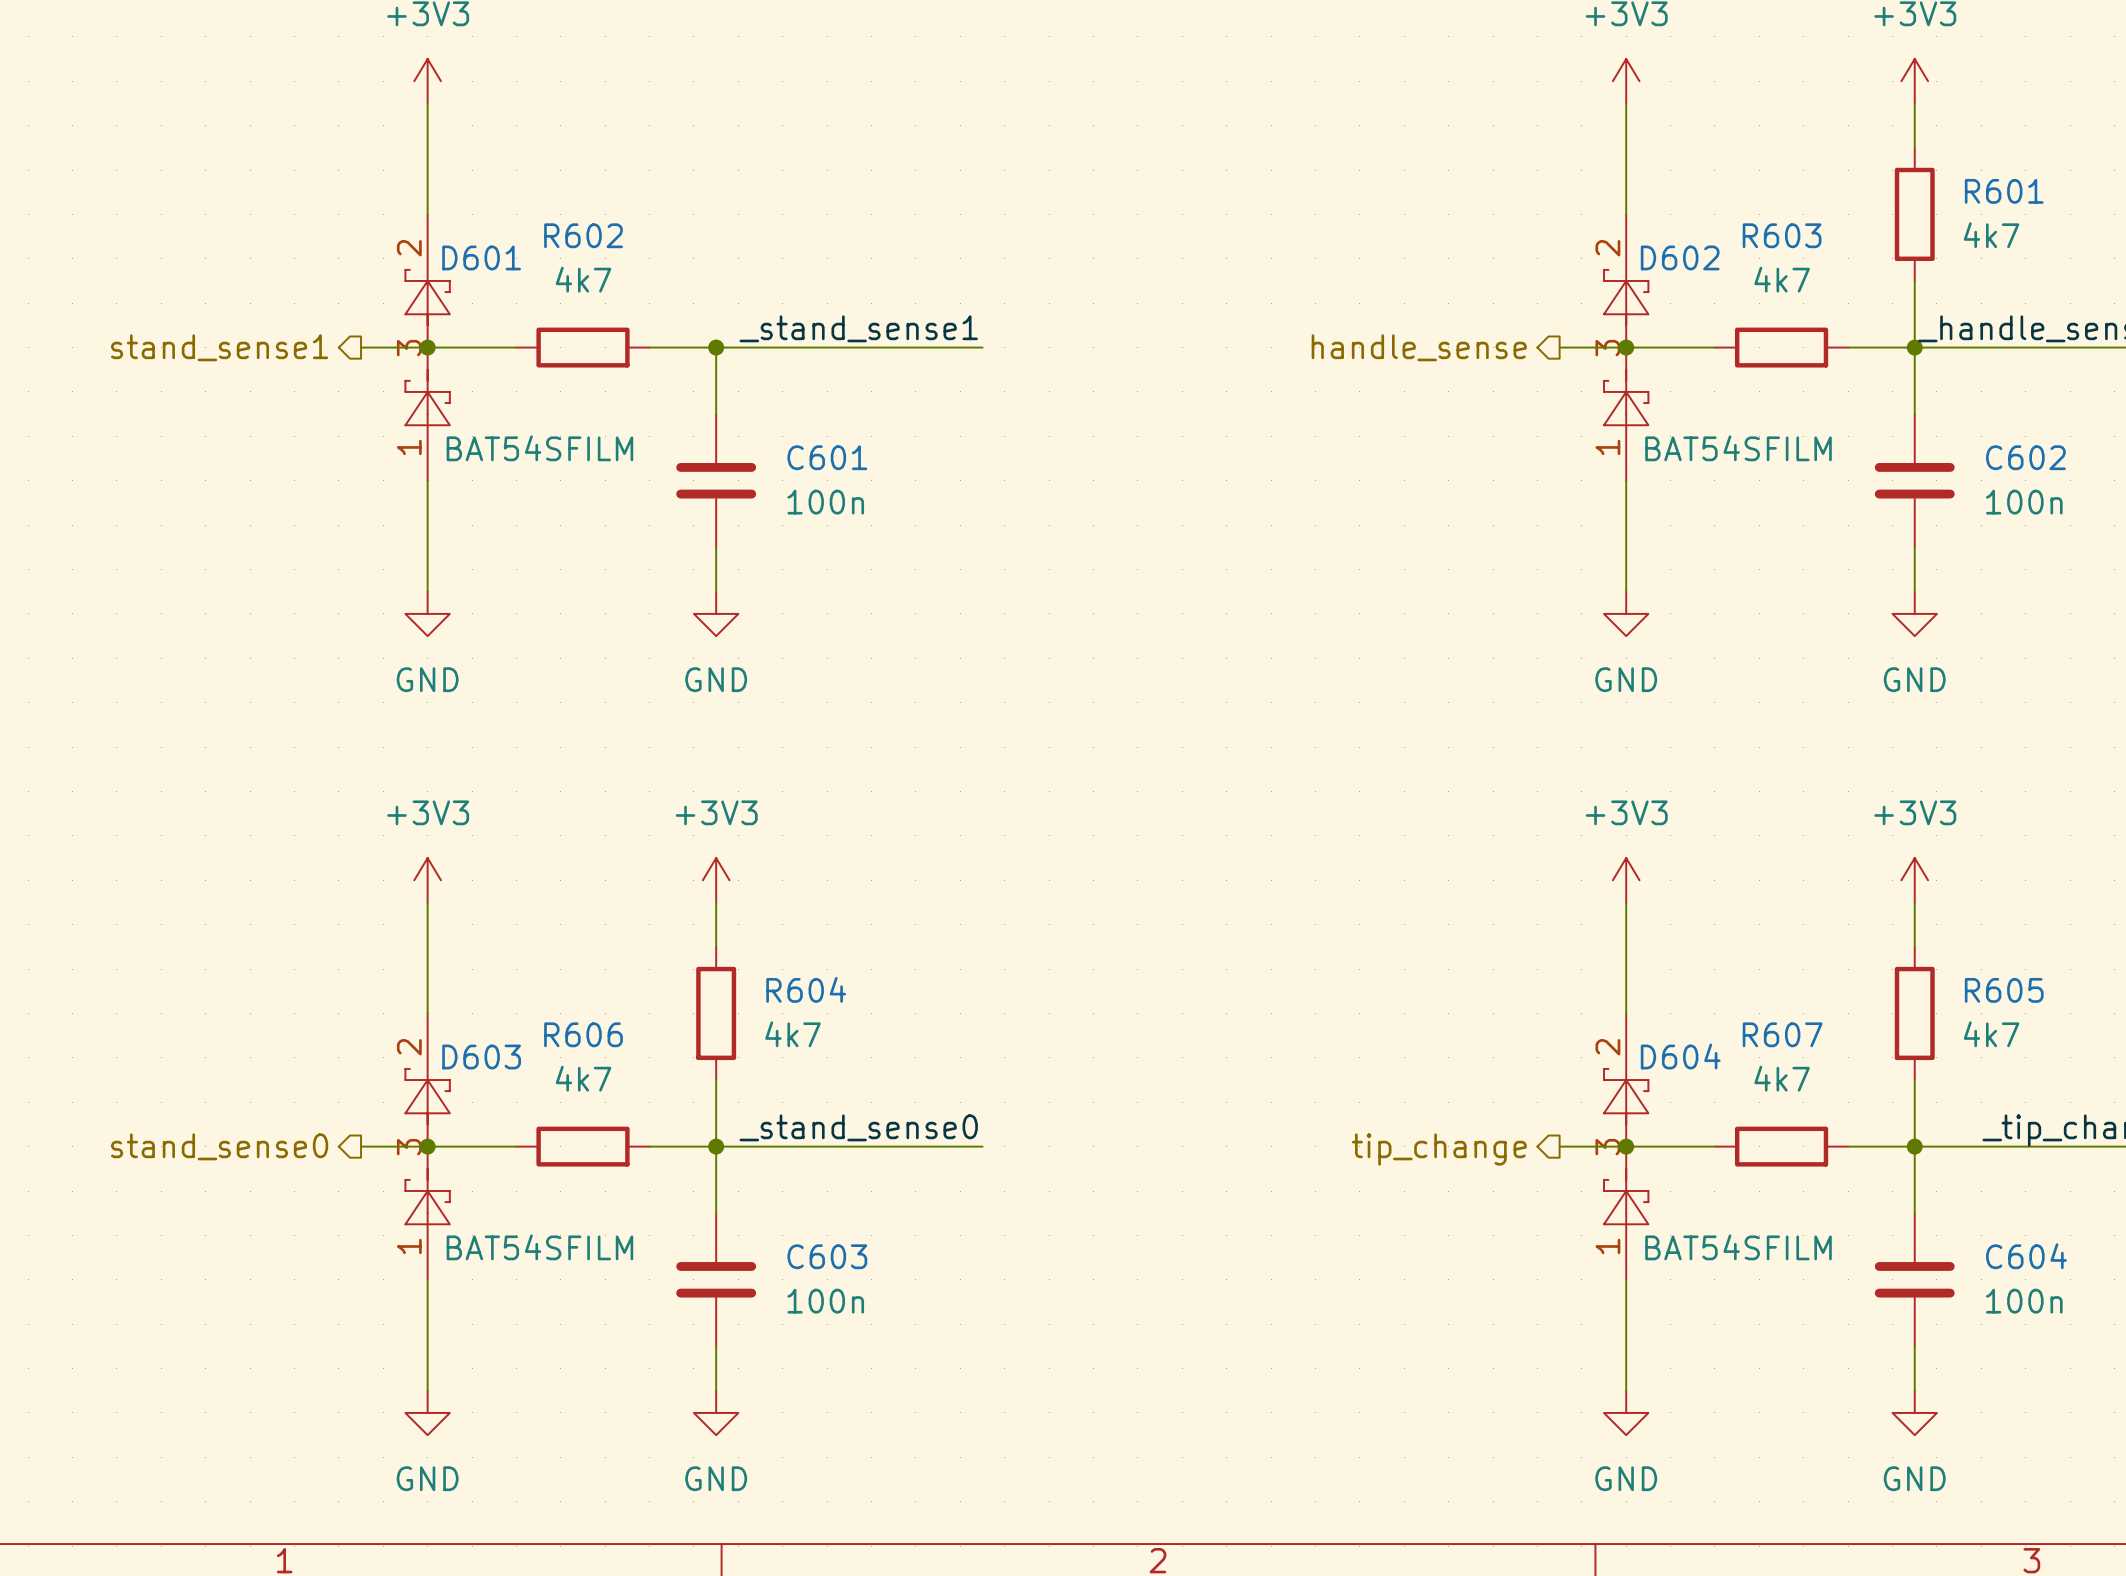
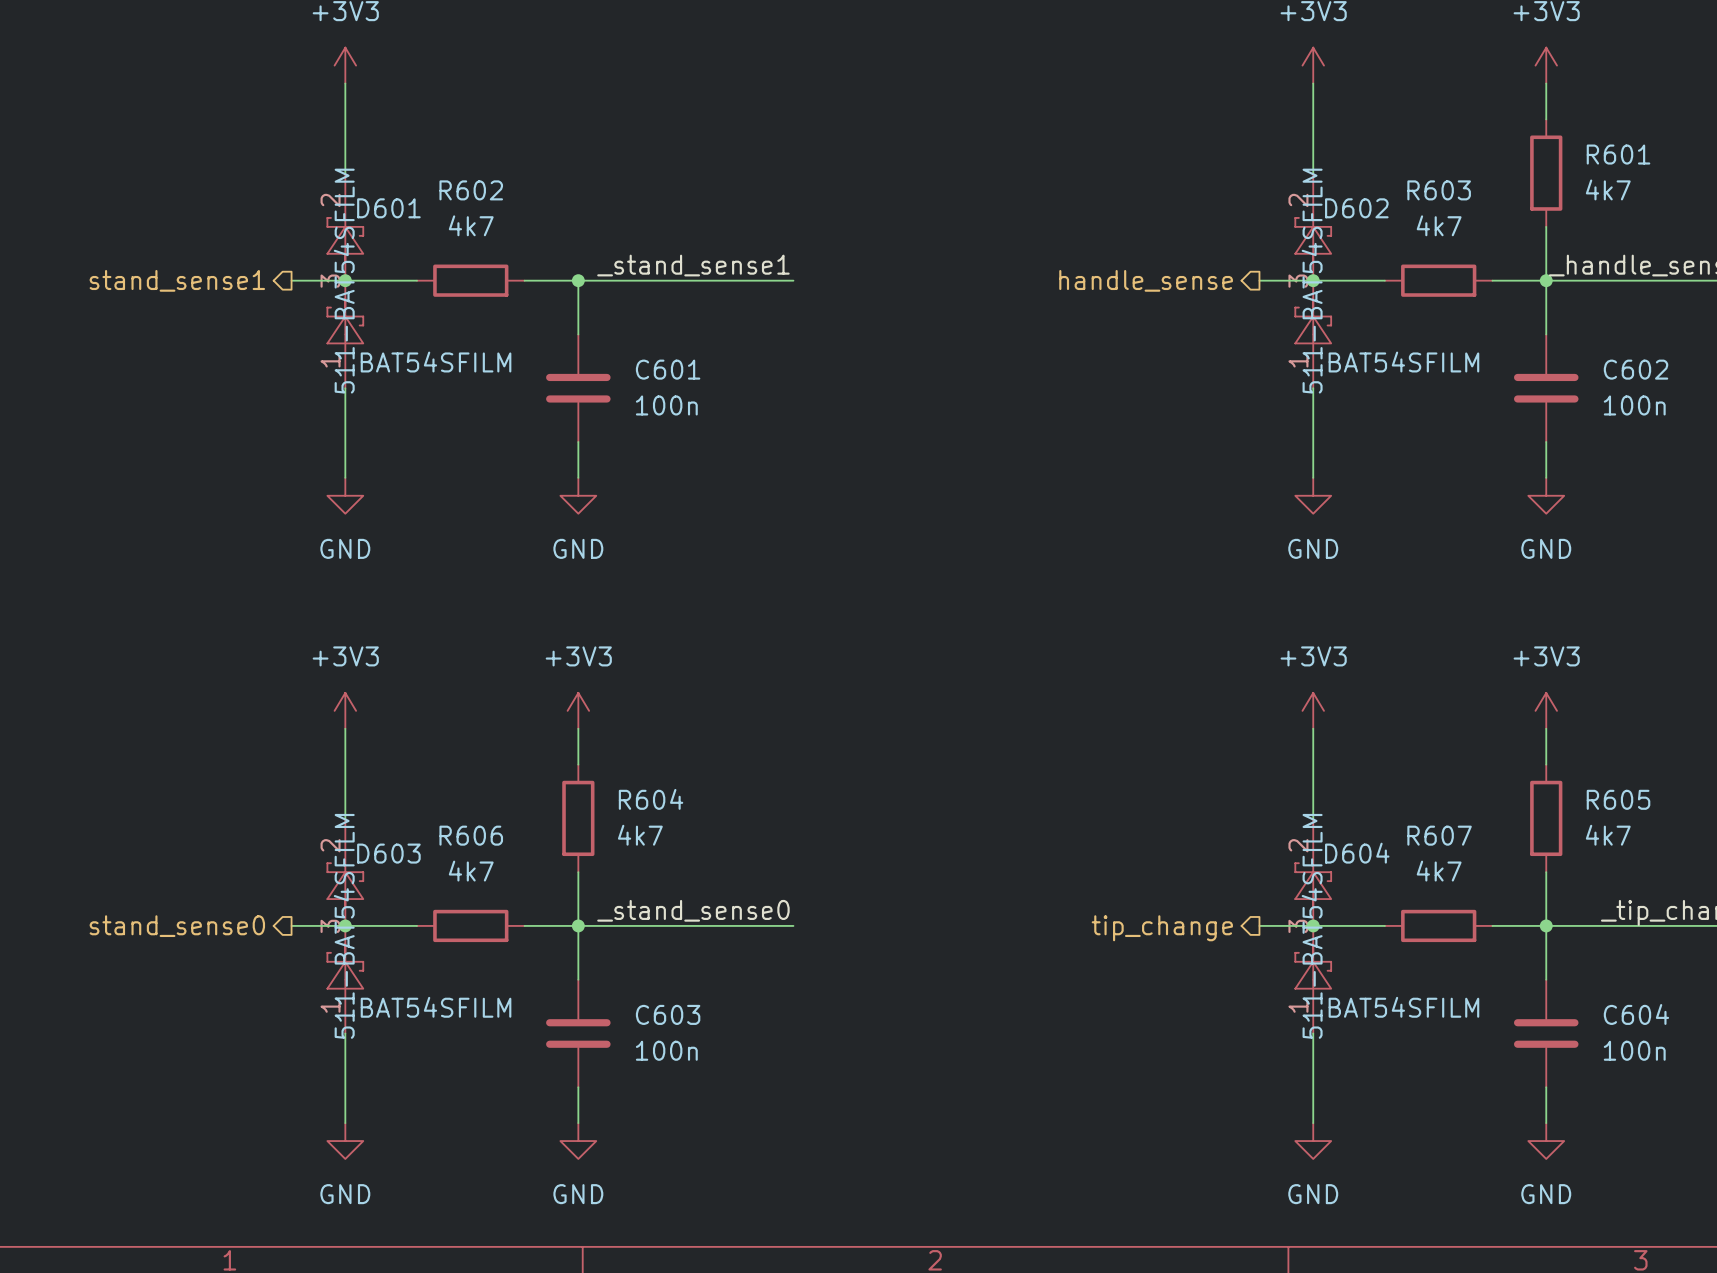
D601 text: none -> 511-BAT54SFILM (344, 281)
D602 text: none -> 511-BAT54SFILM (1312, 281)
D603 text: none -> 511-BAT54SFILM (344, 926)
D604 text: none -> 511-BAT54SFILM (1312, 926)

